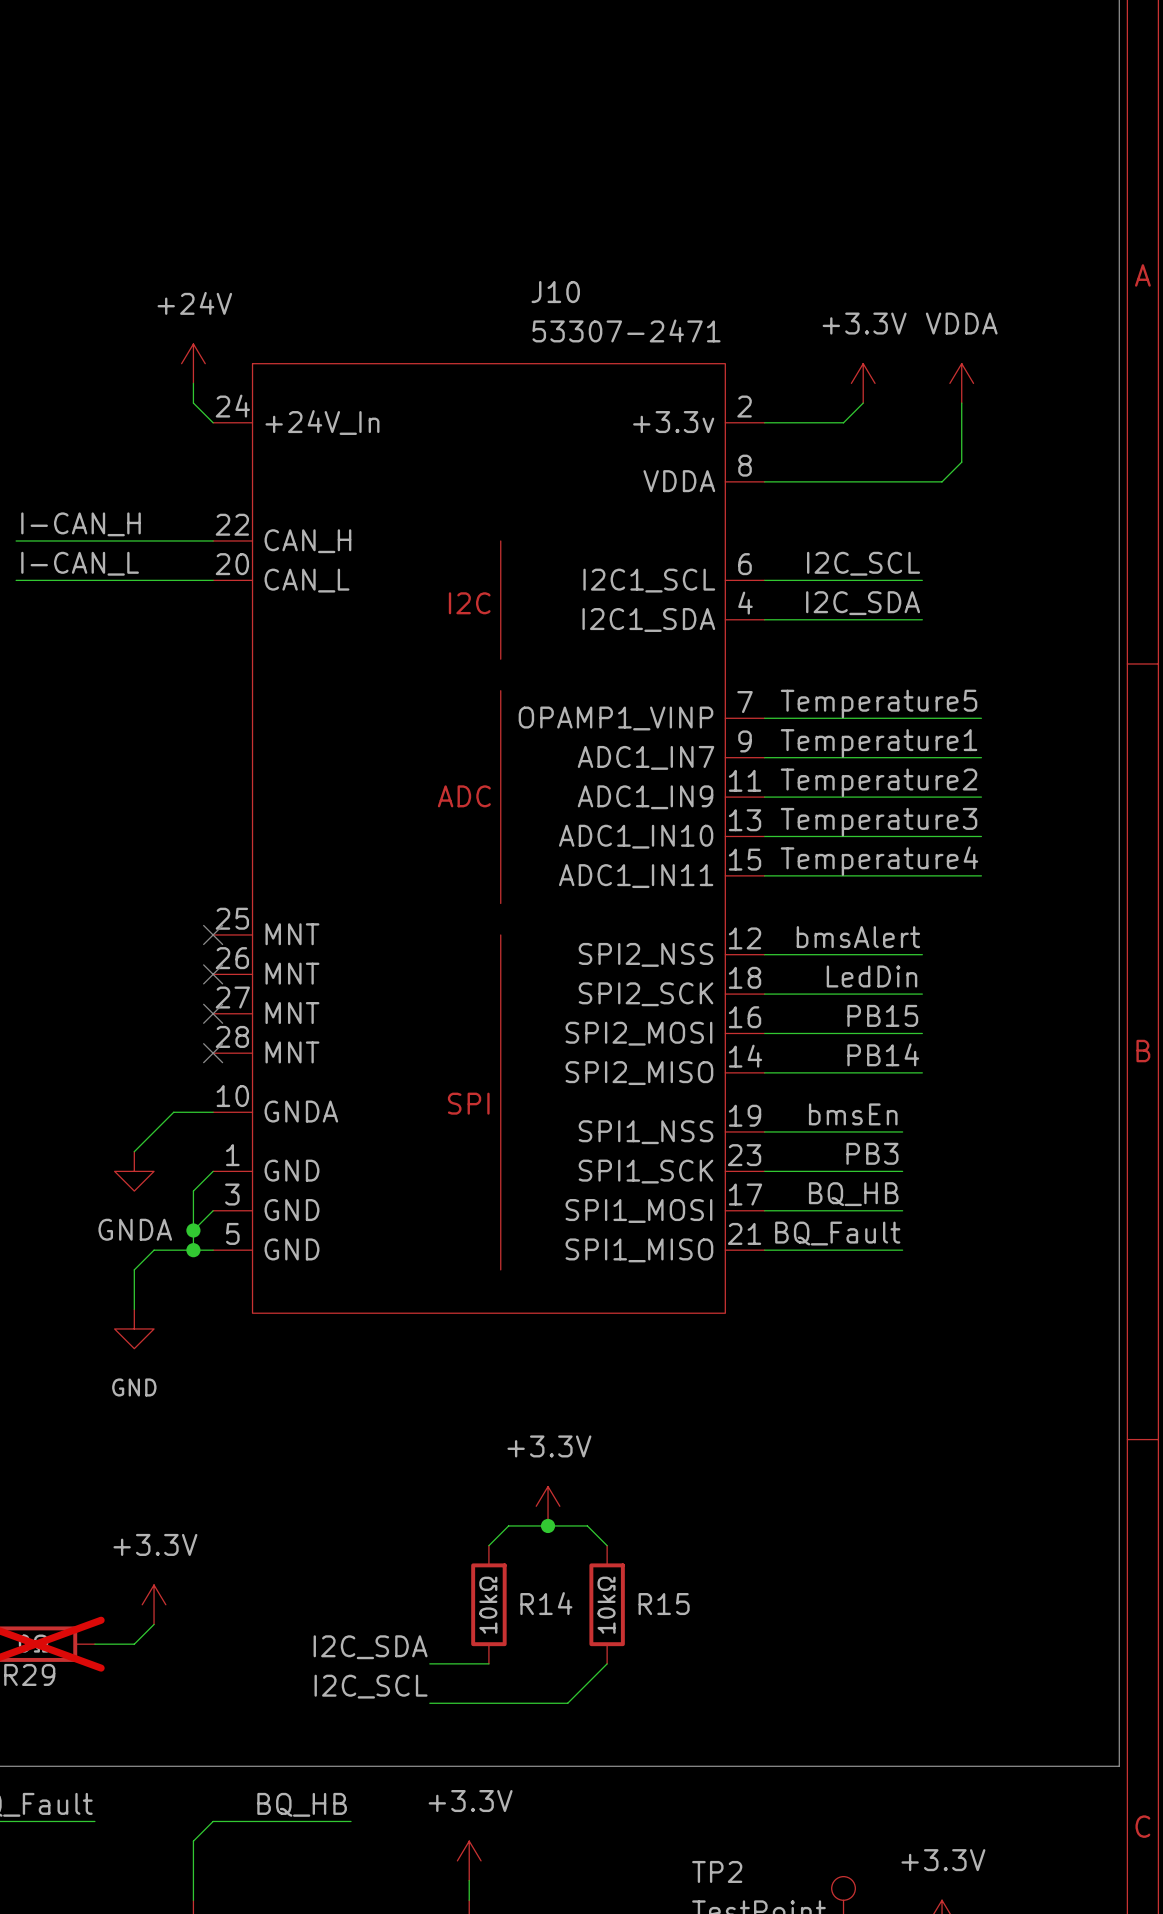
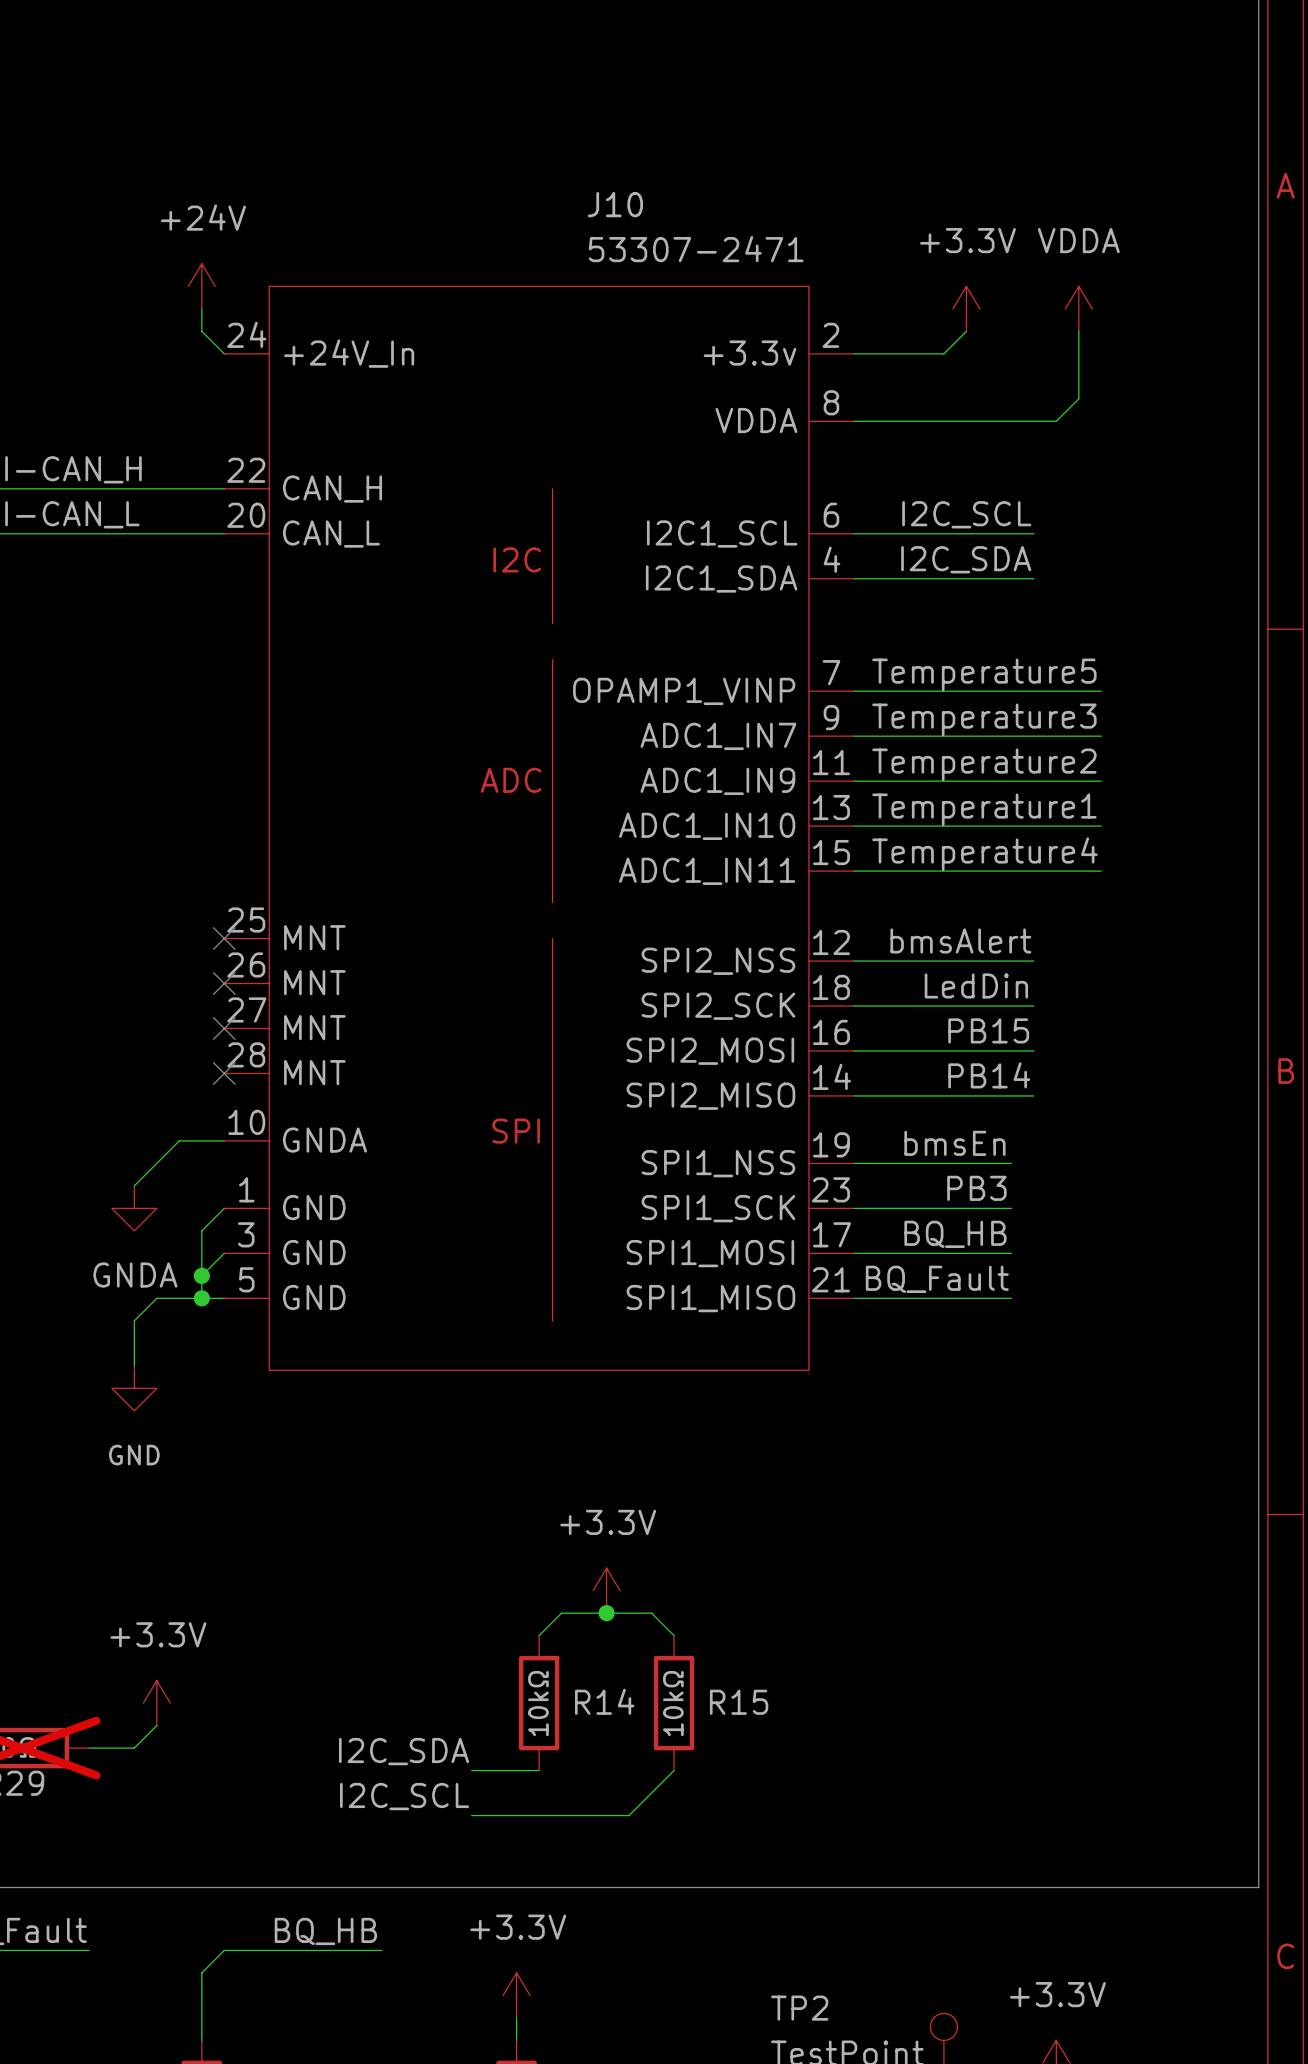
label: Temperature1 (879, 743) -> Temperature3 (984, 719)
label: Temperature3 (879, 822) -> Temperature1 (984, 809)

